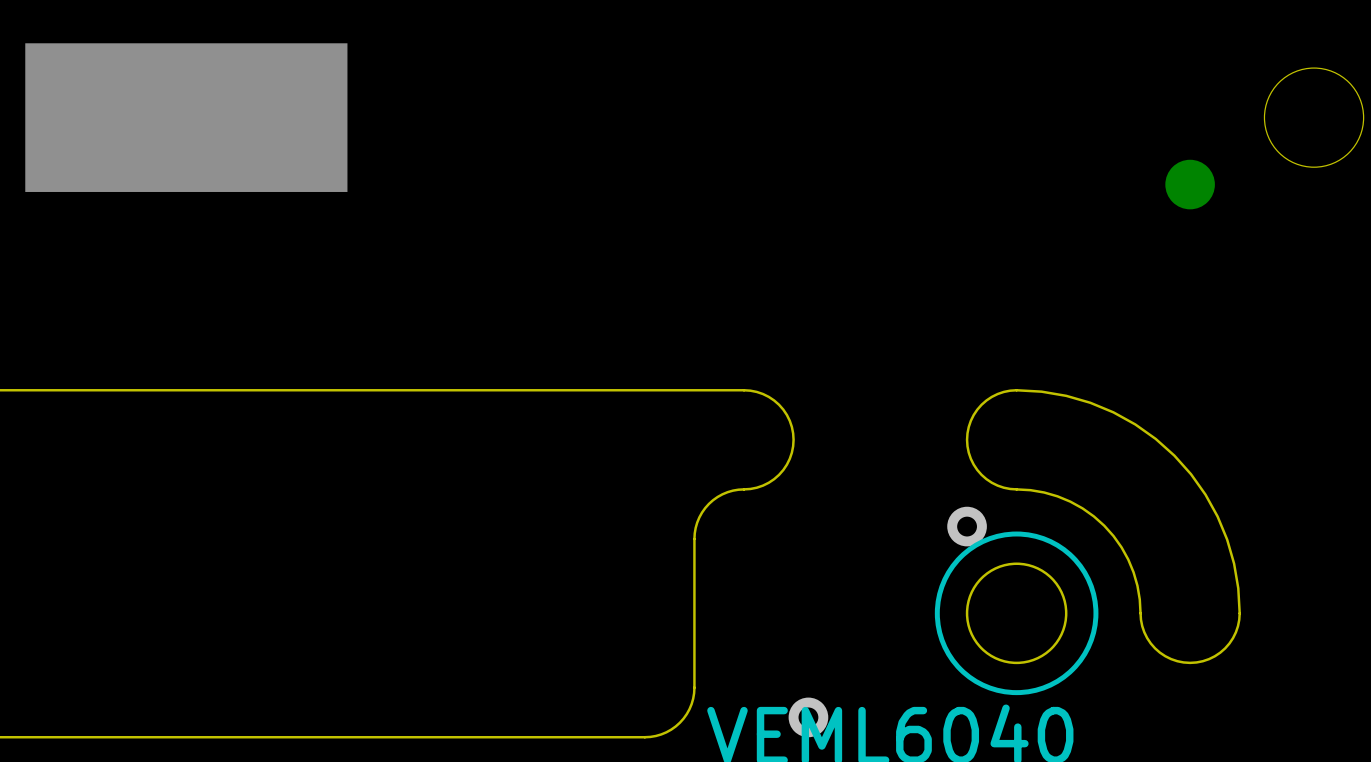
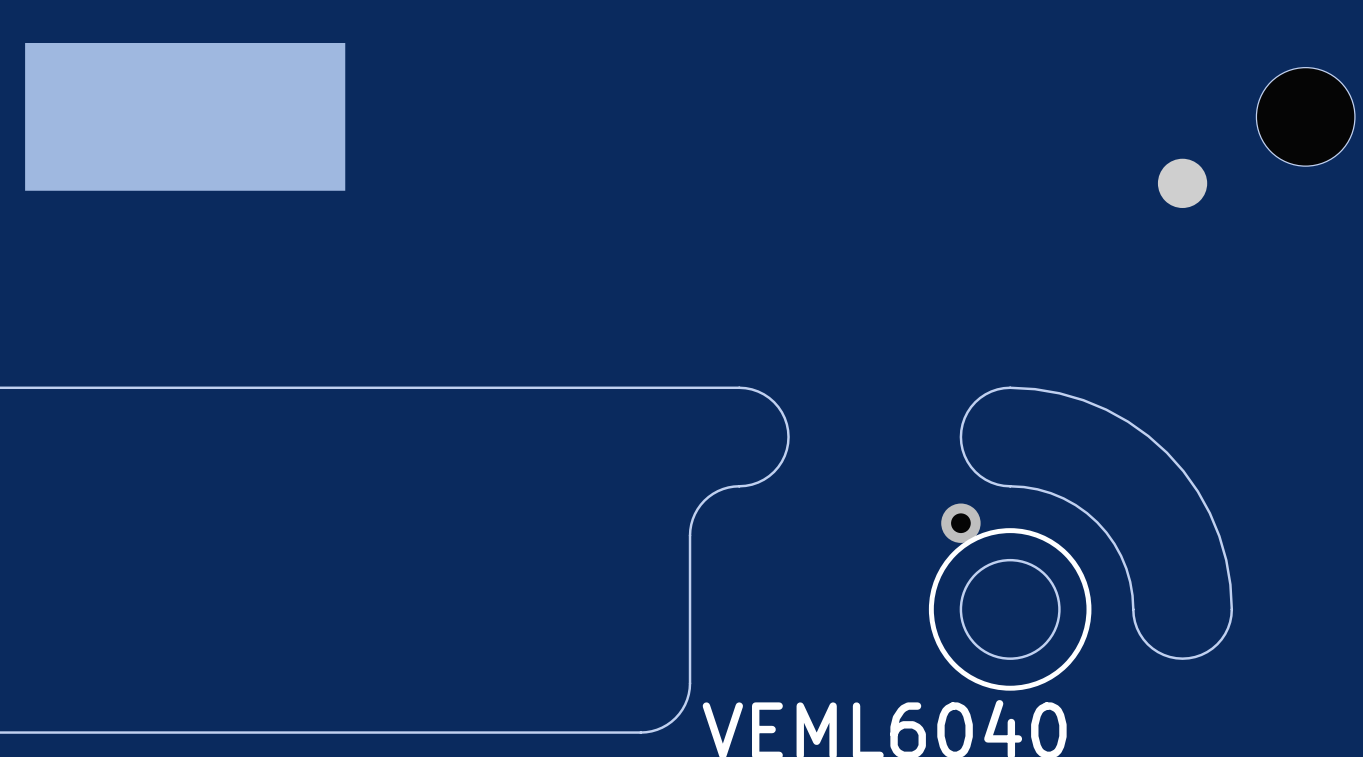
via: (808, 717) -> none

